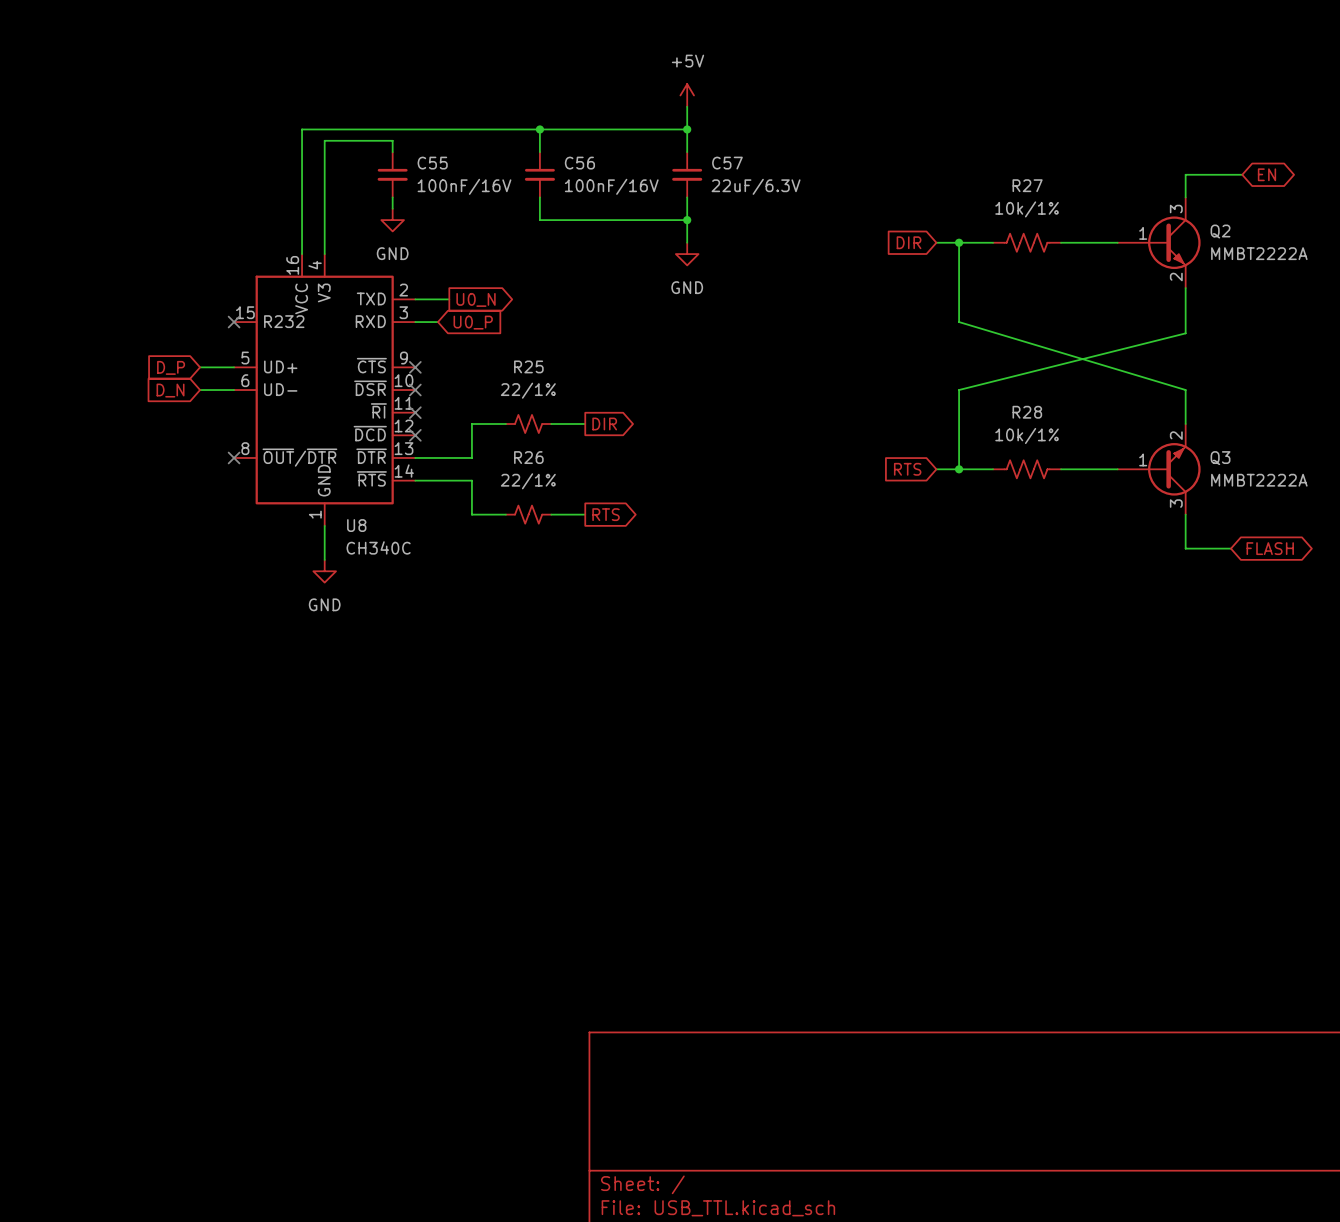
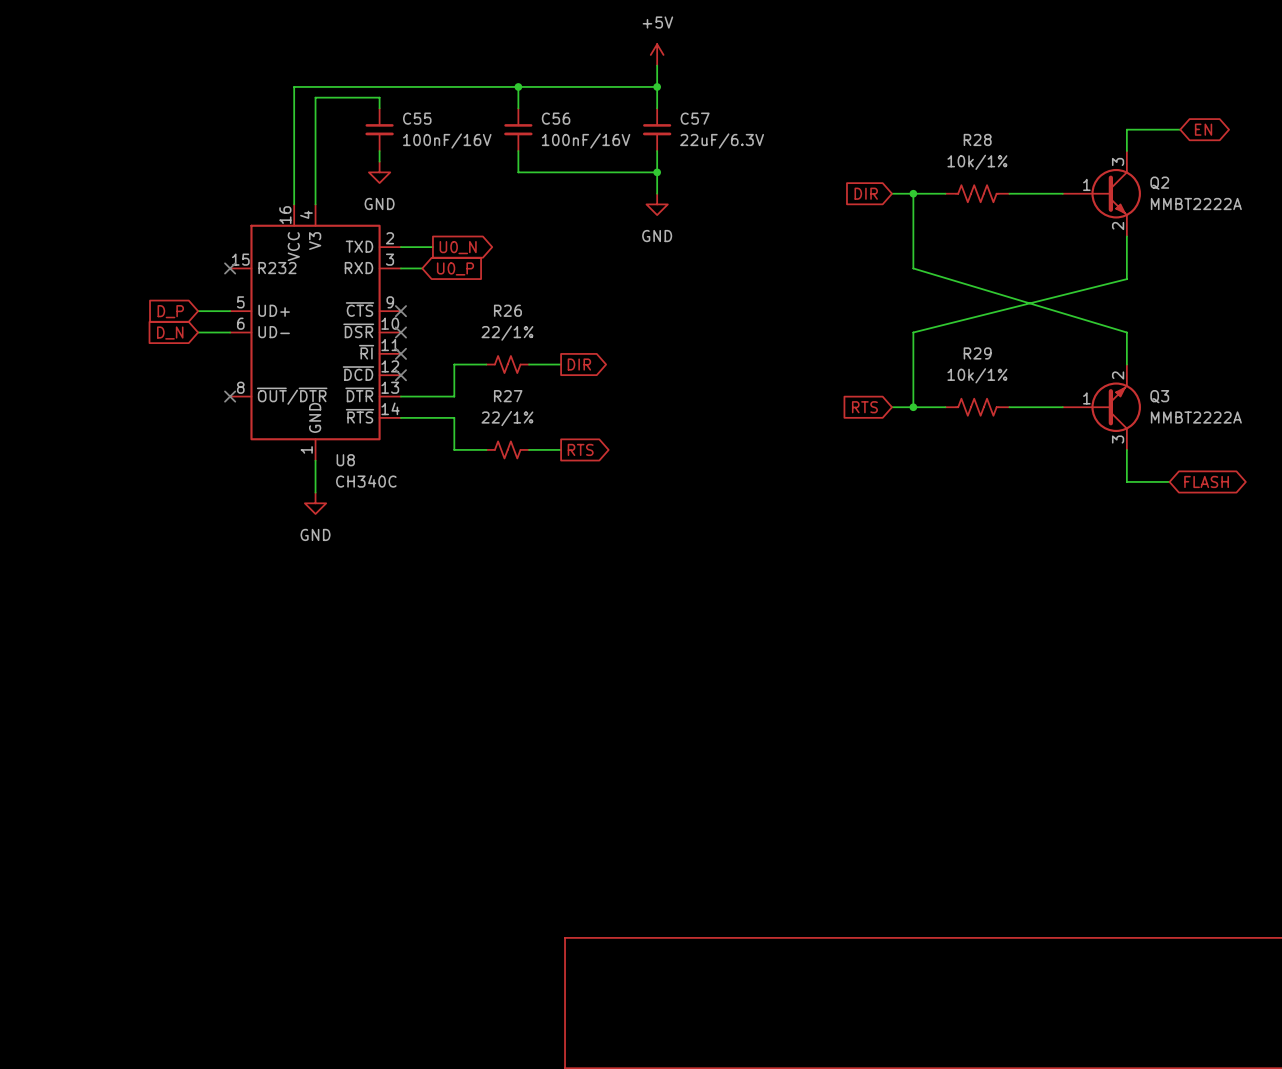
R27 name: R27 (1027, 185) -> R28 (977, 139)
R25 name: R25 (528, 366) -> R26 (507, 310)
R28 name: R28 (1027, 412) -> R29 (977, 353)
R26 name: R26 (528, 457) -> R27 (508, 396)

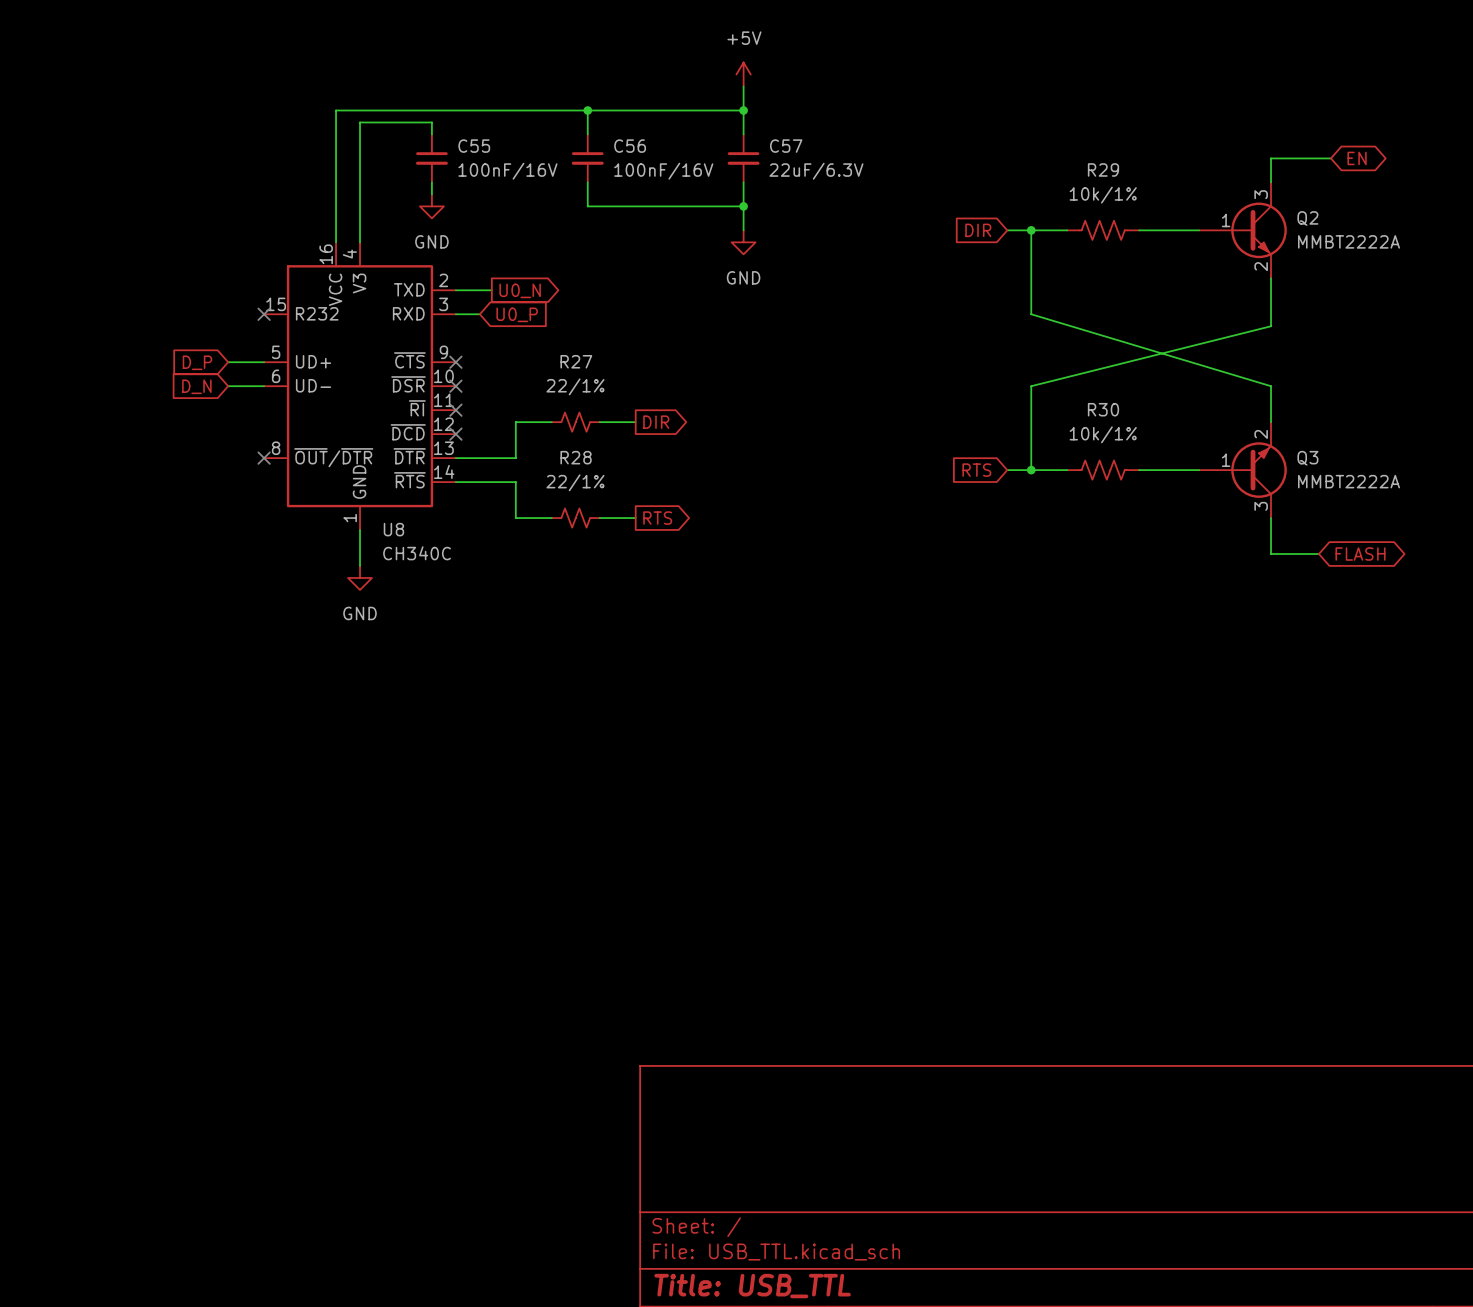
R28 name: R28 (977, 139) -> R29 (1103, 169)
R26 name: R26 (507, 310) -> R27 (576, 361)
R29 name: R29 (977, 353) -> R30 (1103, 409)
R27 name: R27 (508, 396) -> R28 (576, 457)

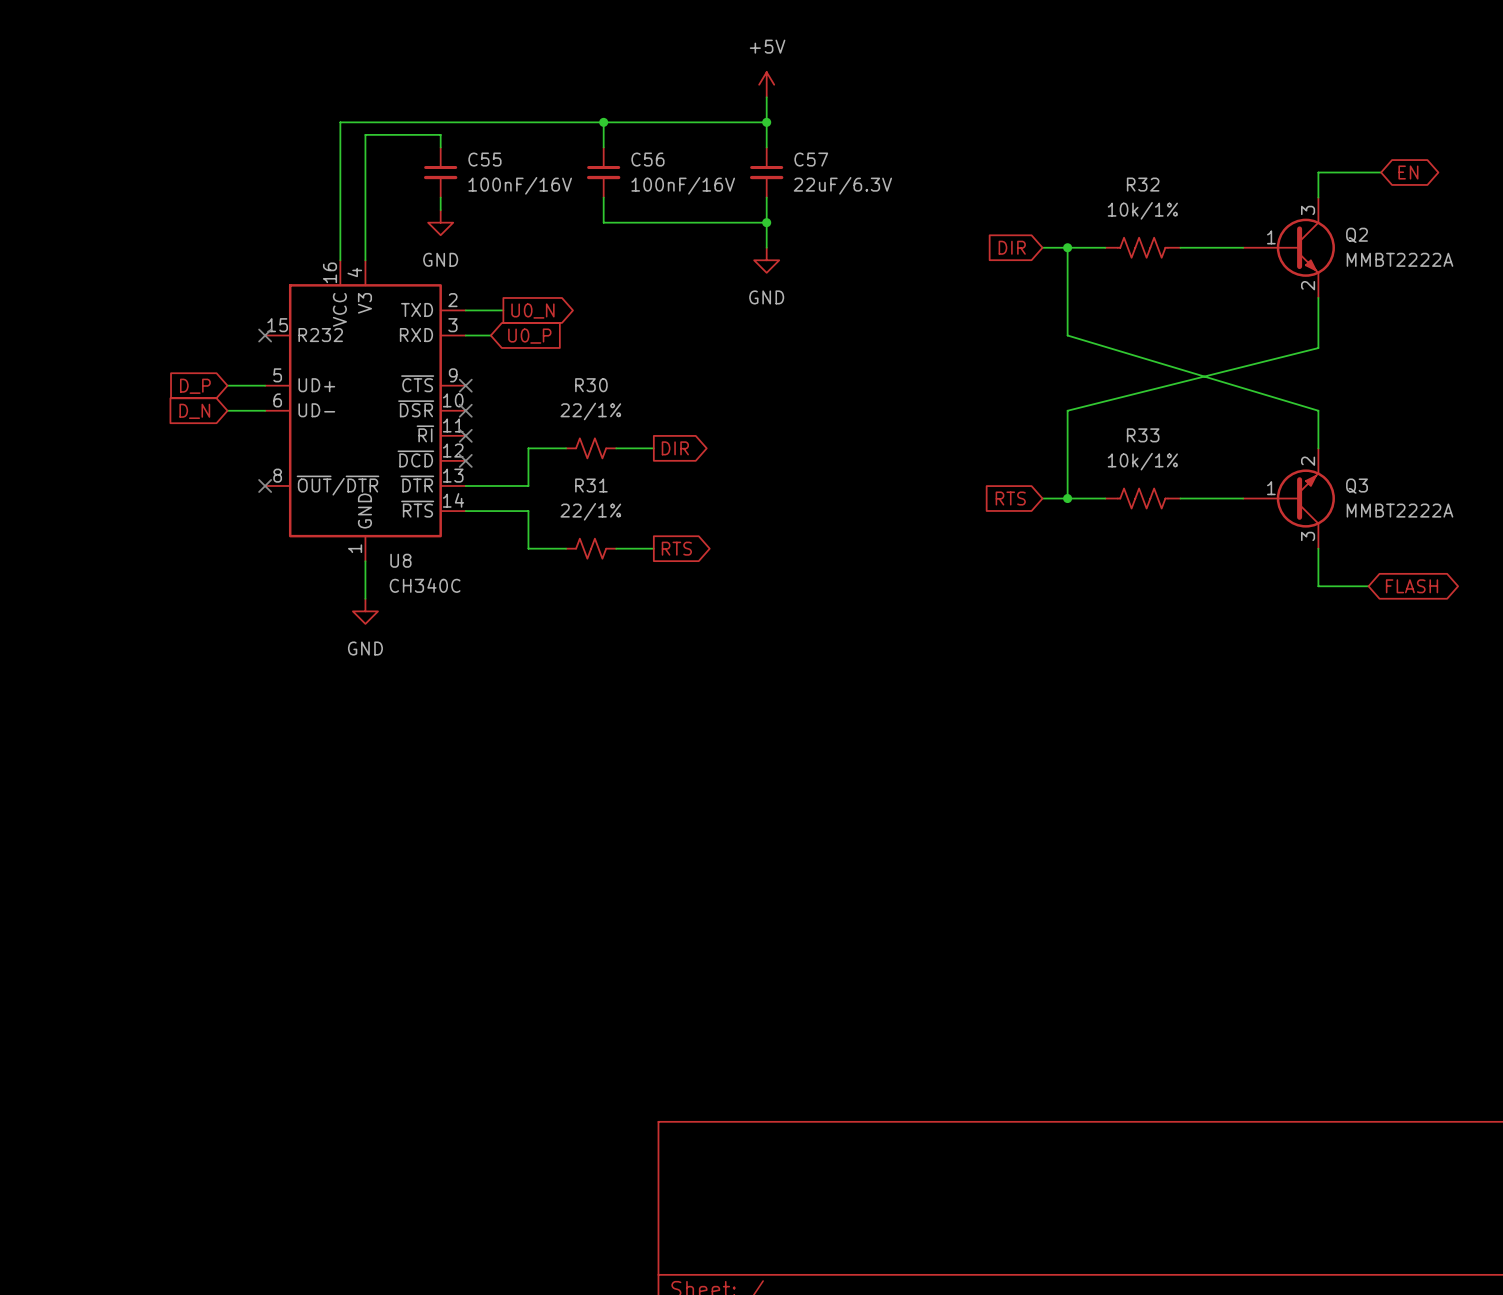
R29 name: R29 (1103, 169) -> R32 (1143, 184)
R27 name: R27 (576, 361) -> R30 (591, 385)
R30 name: R30 (1103, 409) -> R33 (1143, 435)
R28 name: R28 (576, 457) -> R31 (591, 485)

